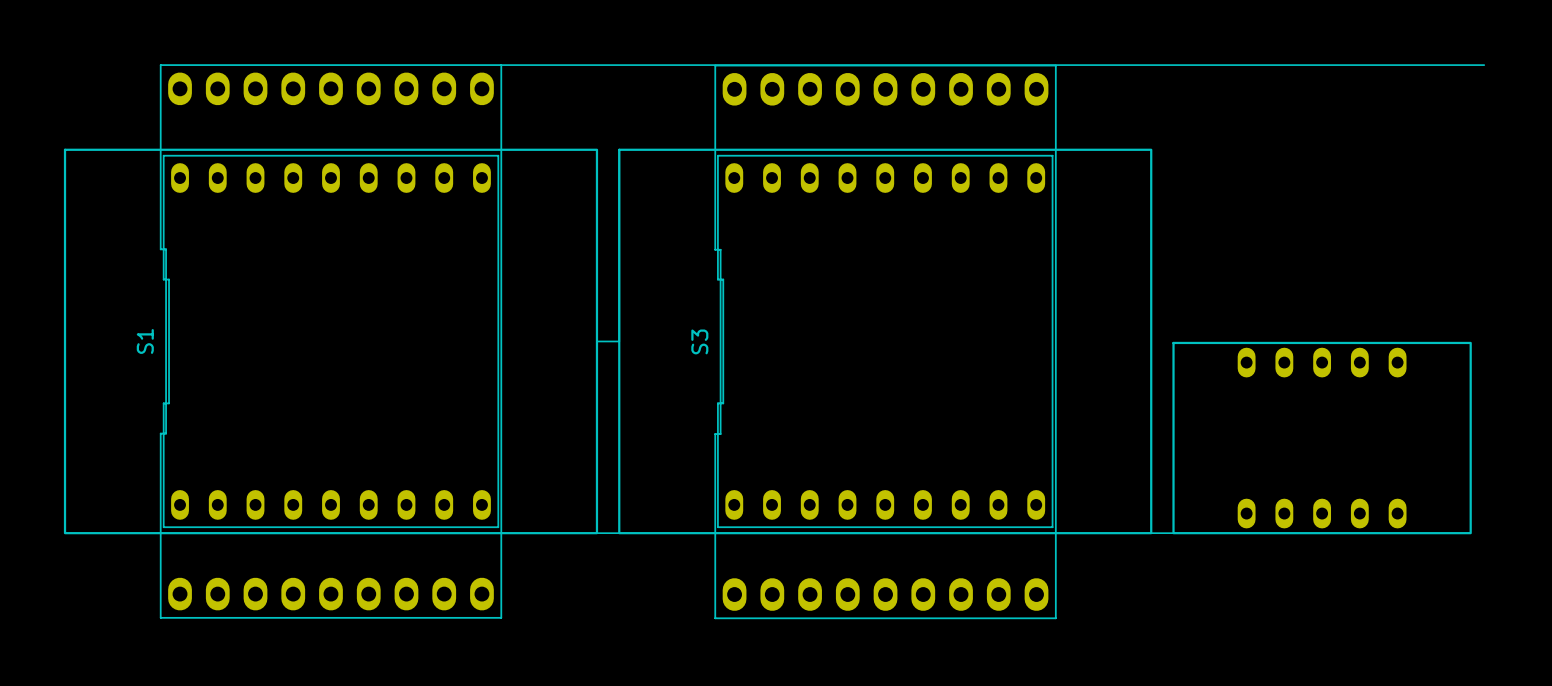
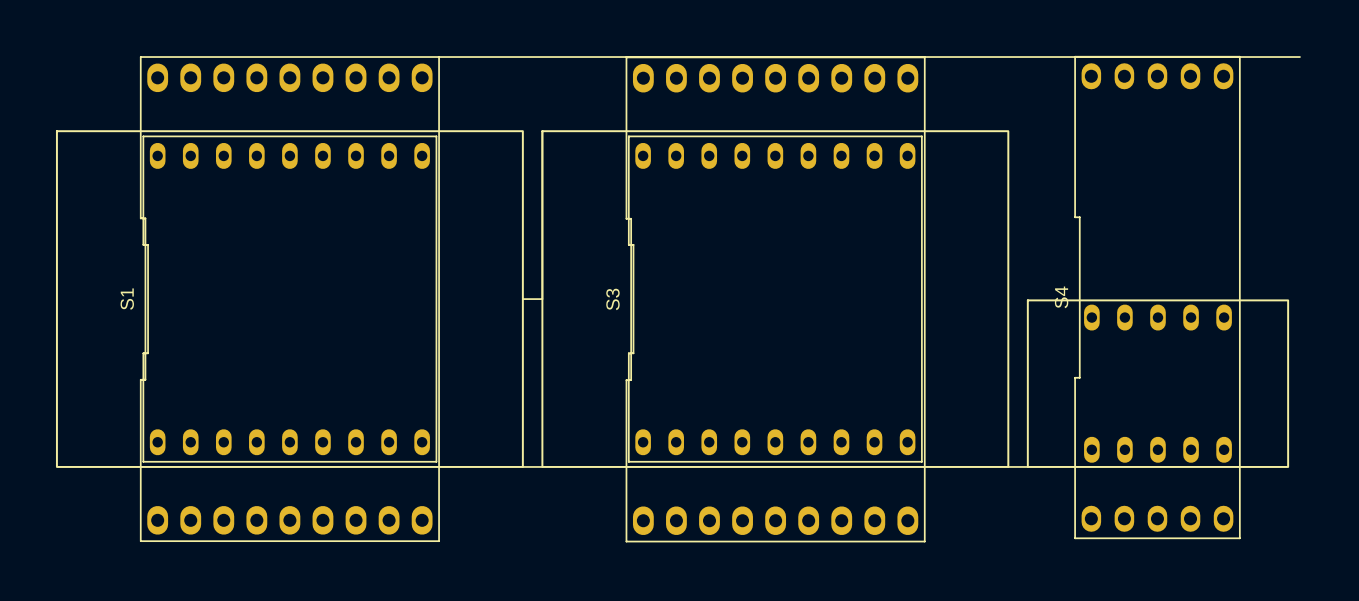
S4: none -> (1157, 297)

